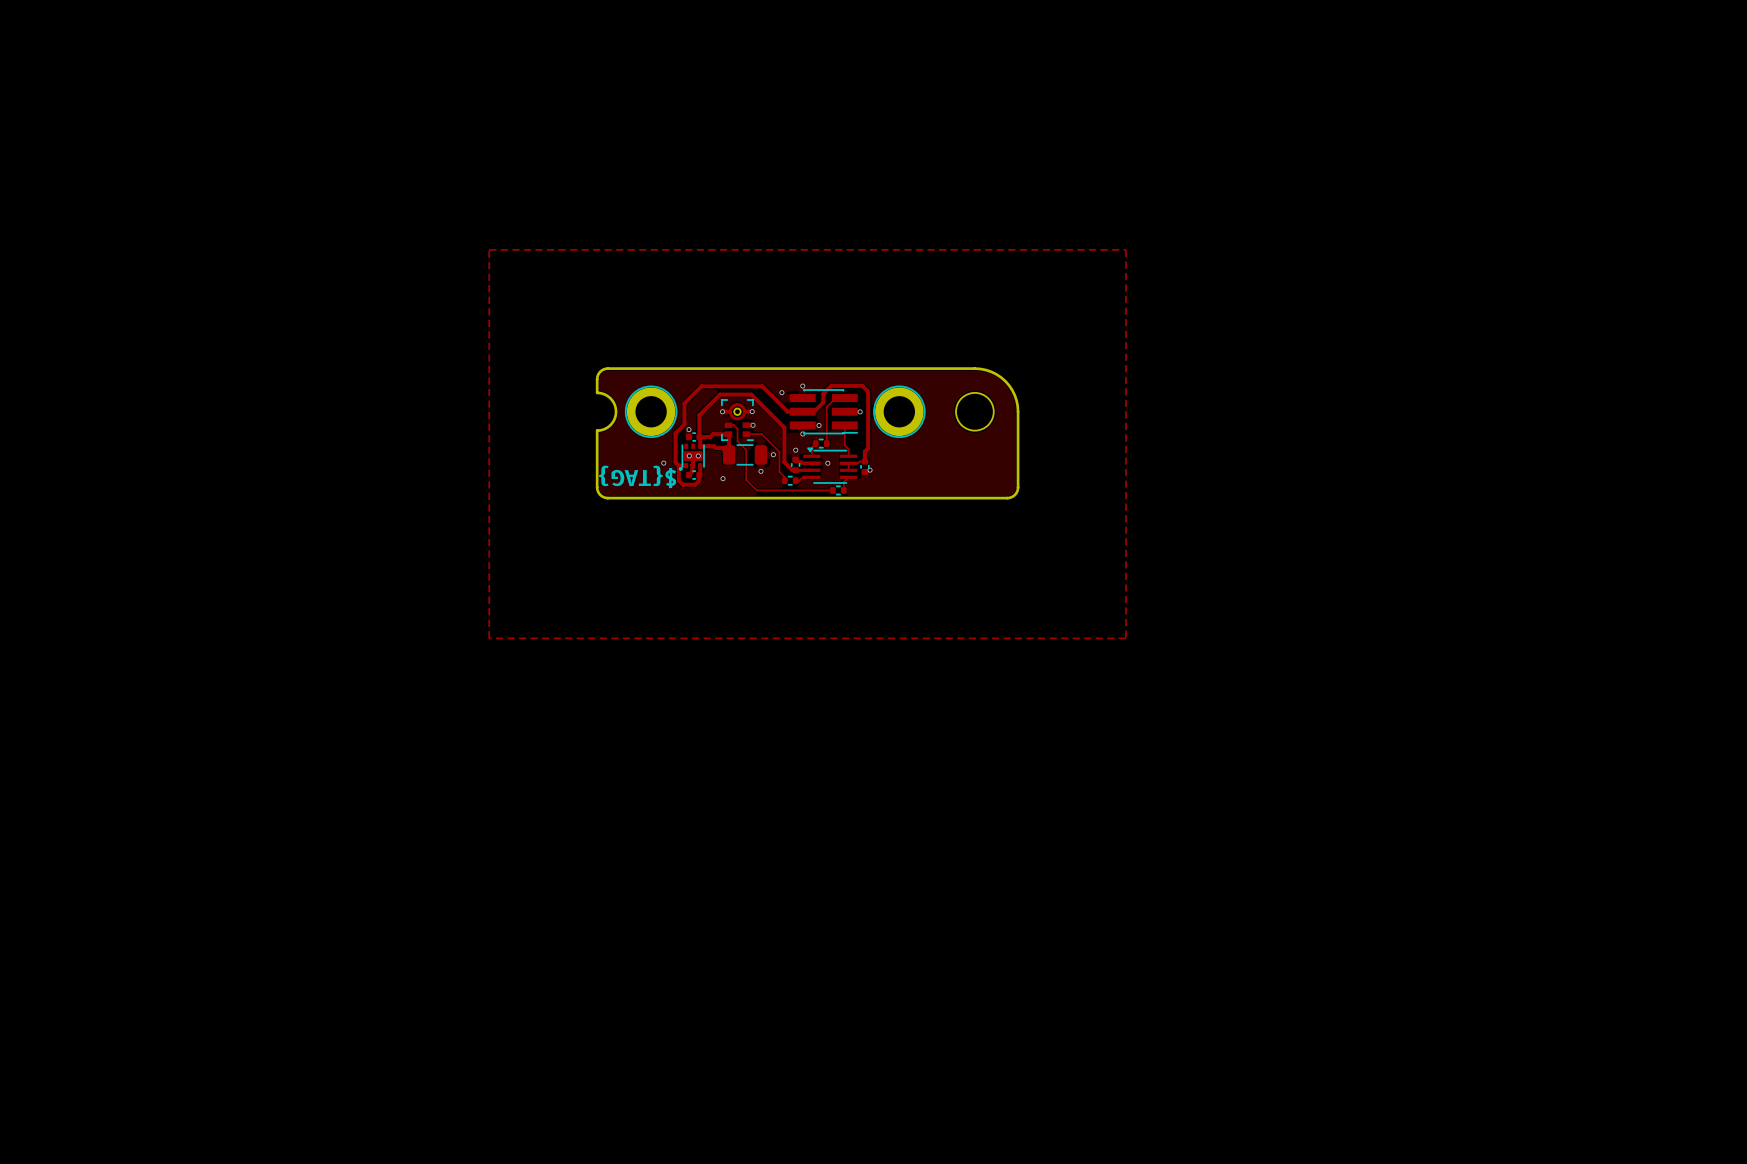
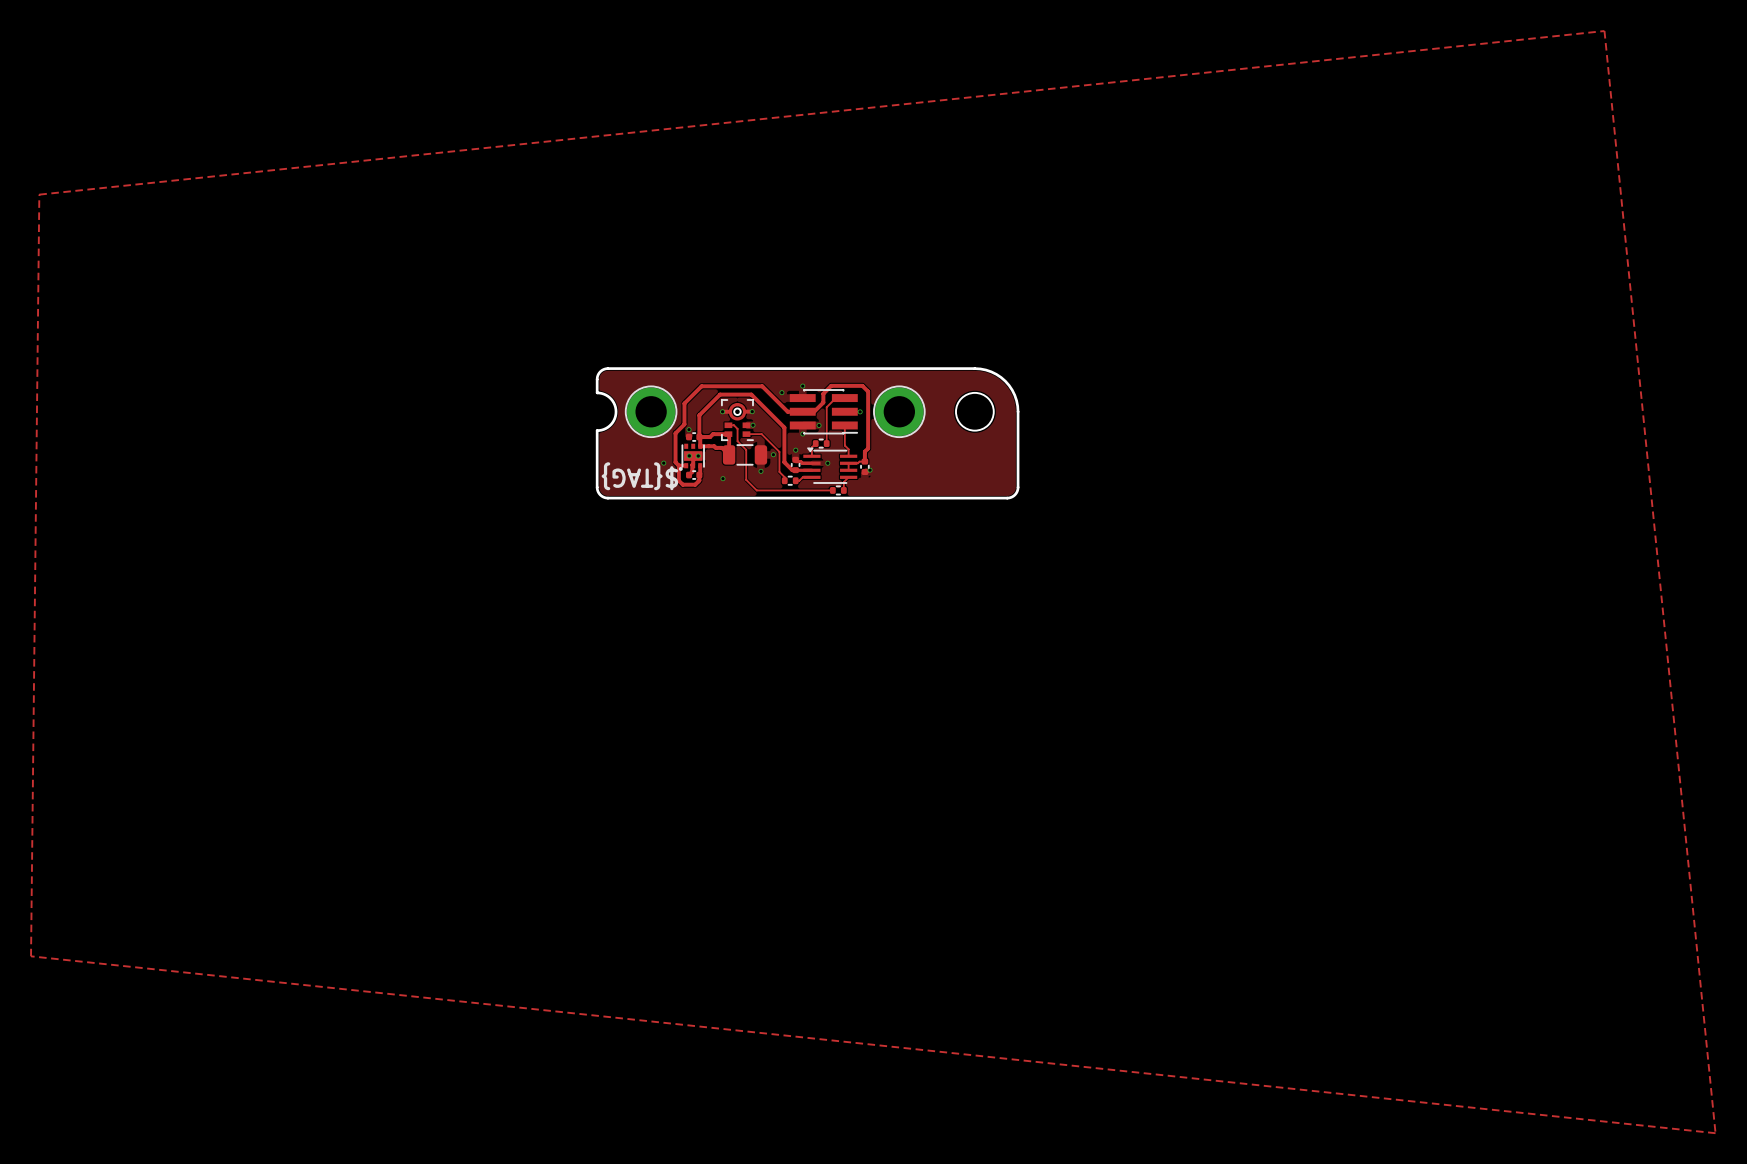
zone outline: none -> (1604, 31) (39, 194) (31, 956) (1715, 1133) (1604, 31)
zone outline: (489, 249) (1125, 249) (1125, 638) (489, 638) (489, 249) -> none

